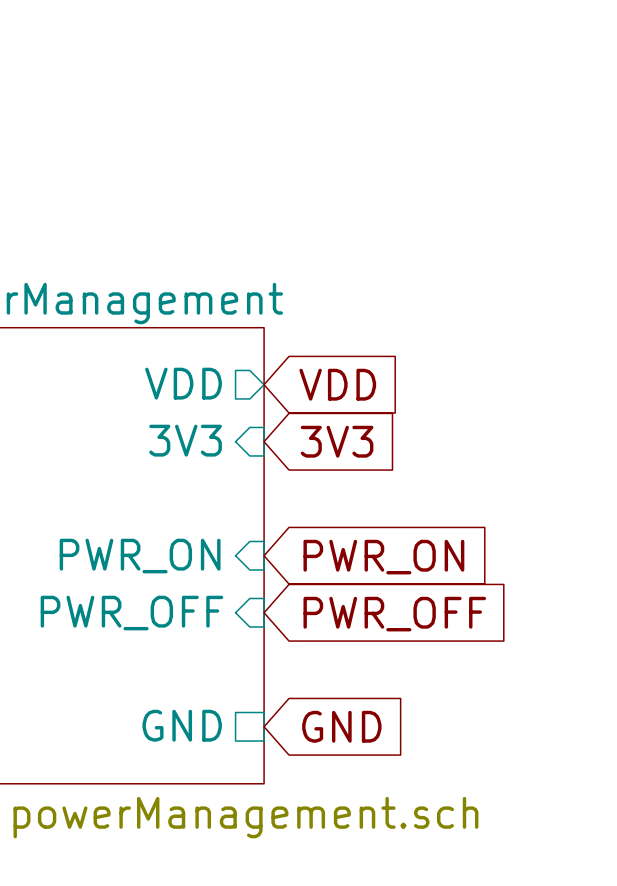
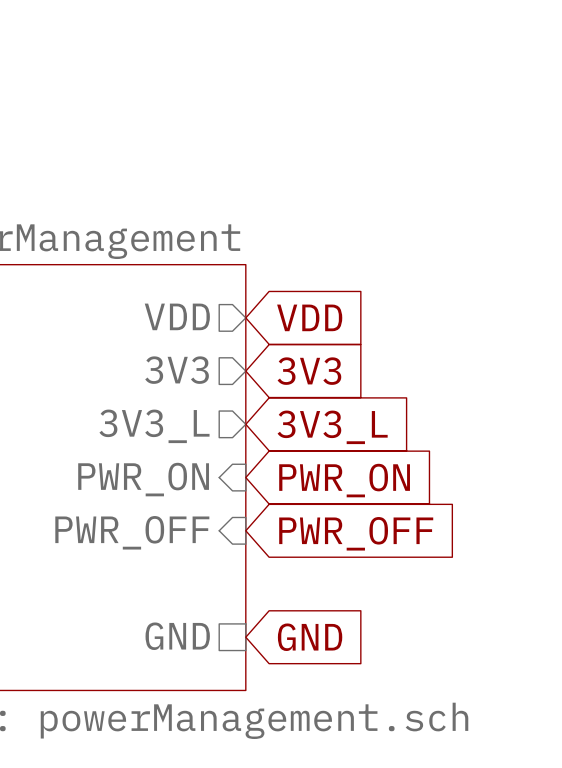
sheet pin shape: input (185, 440) -> output (177, 370)
sheet pin: none -> 3V3_L (154, 426)
global label: none -> 3V3_L (332, 427)

